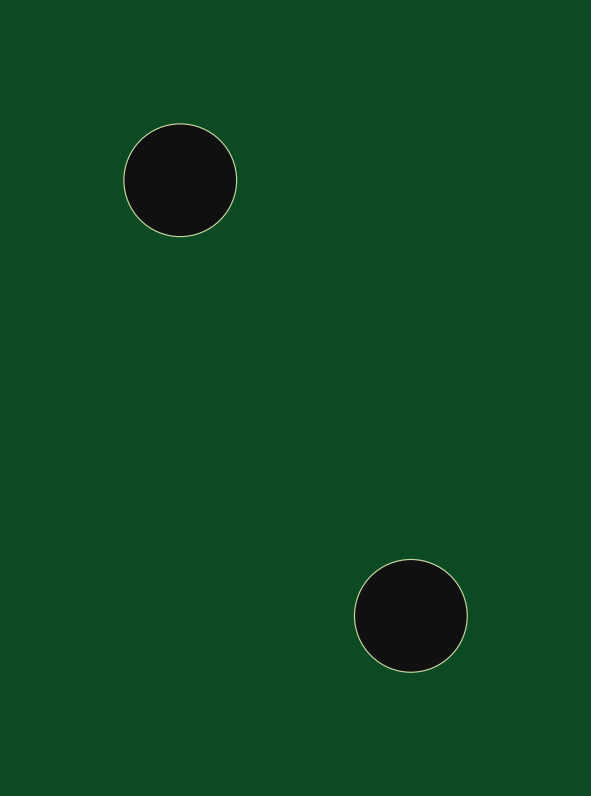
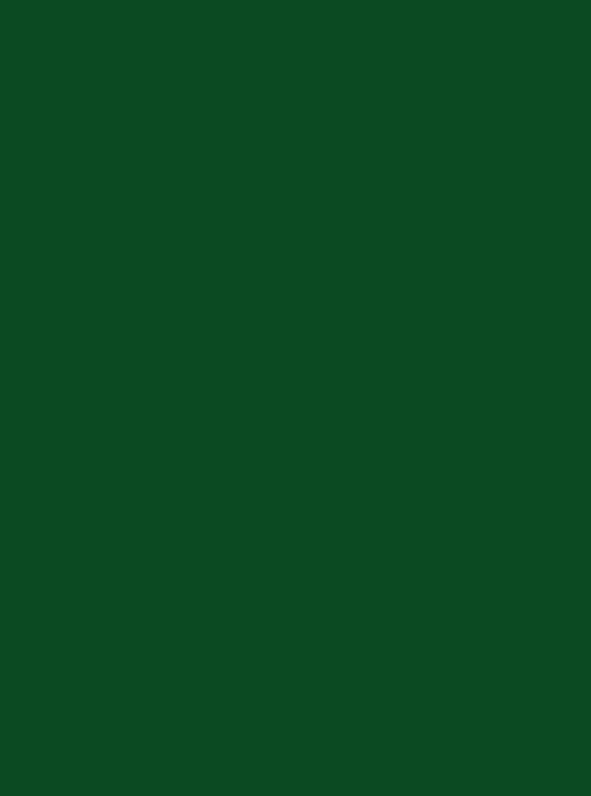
part: (180, 180) -> none
part: (410, 615) -> none

